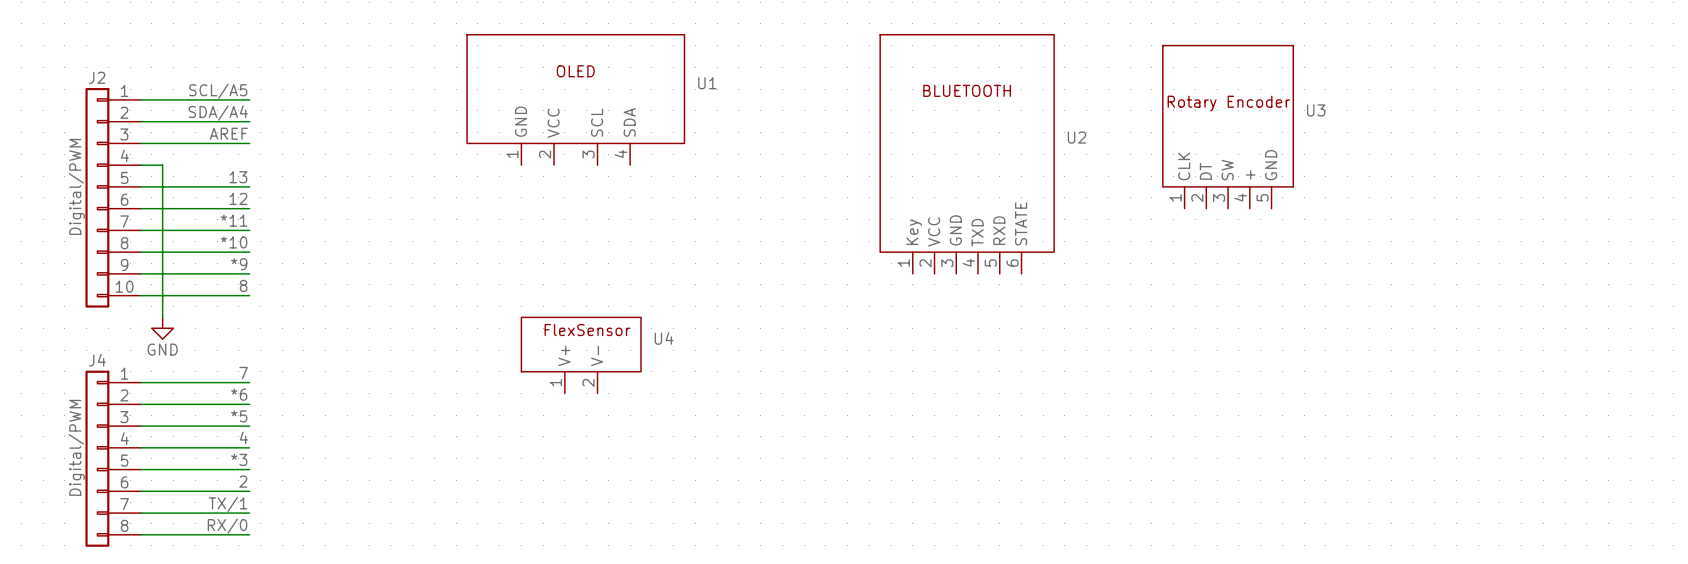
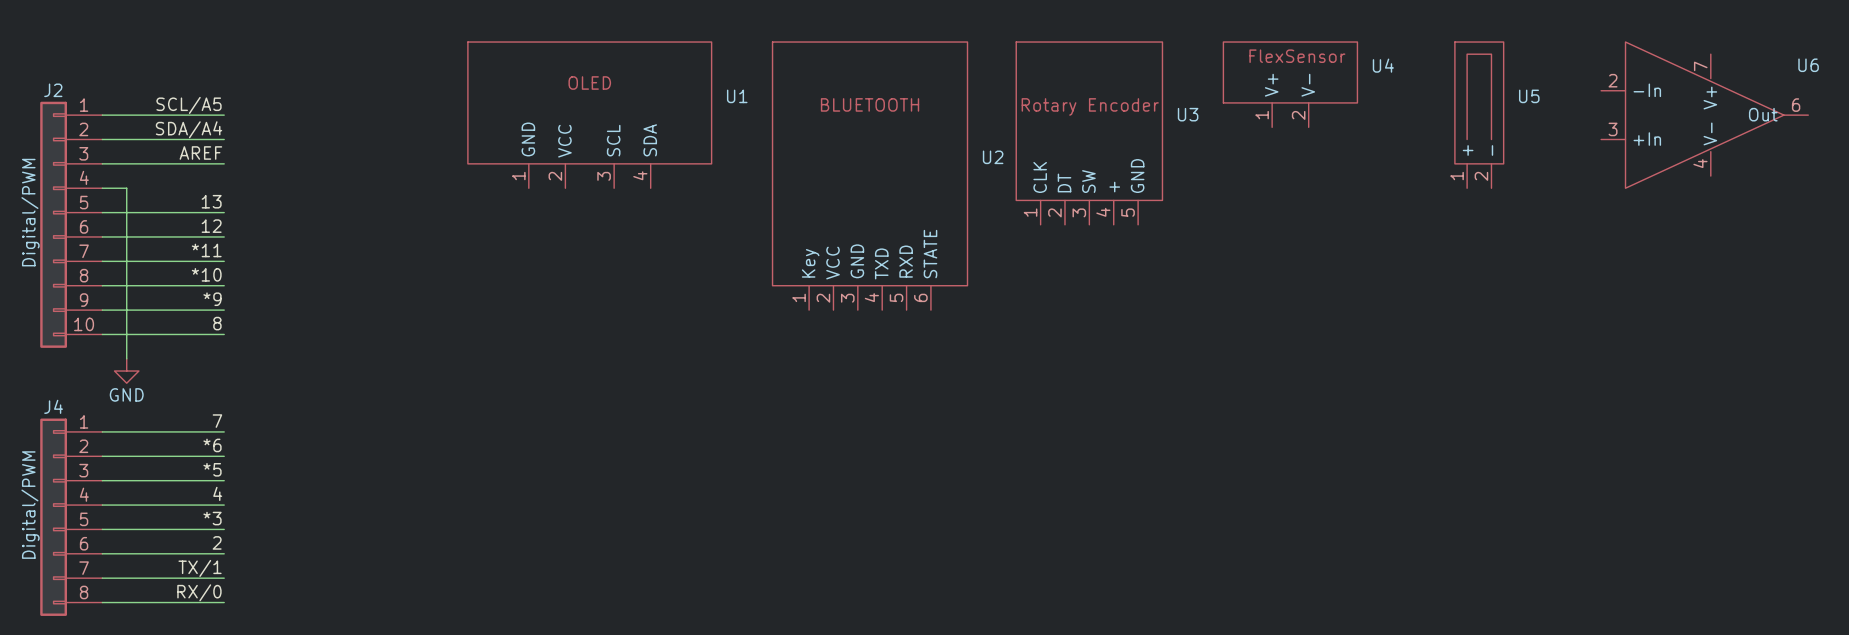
U5: none -> (1479, 115)
U6: none -> (1704, 115)
U3 position: (1228, 127) -> (1089, 133)
U2 position: (967, 154) -> (870, 176)
U4 position: (581, 355) -> (1290, 84)

